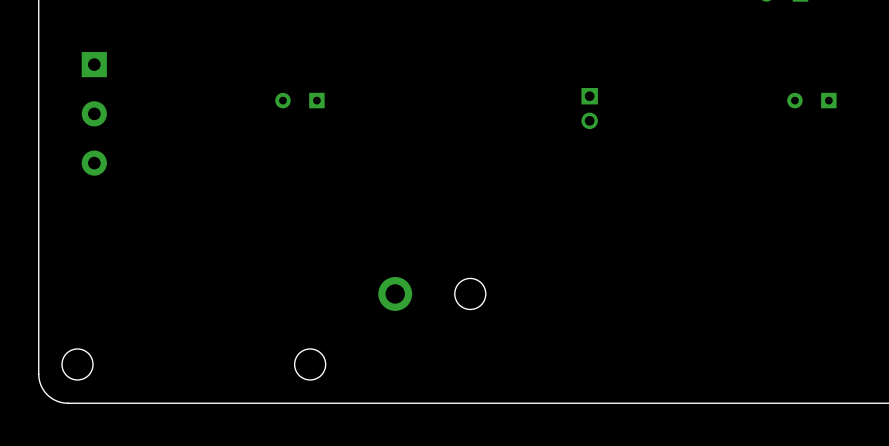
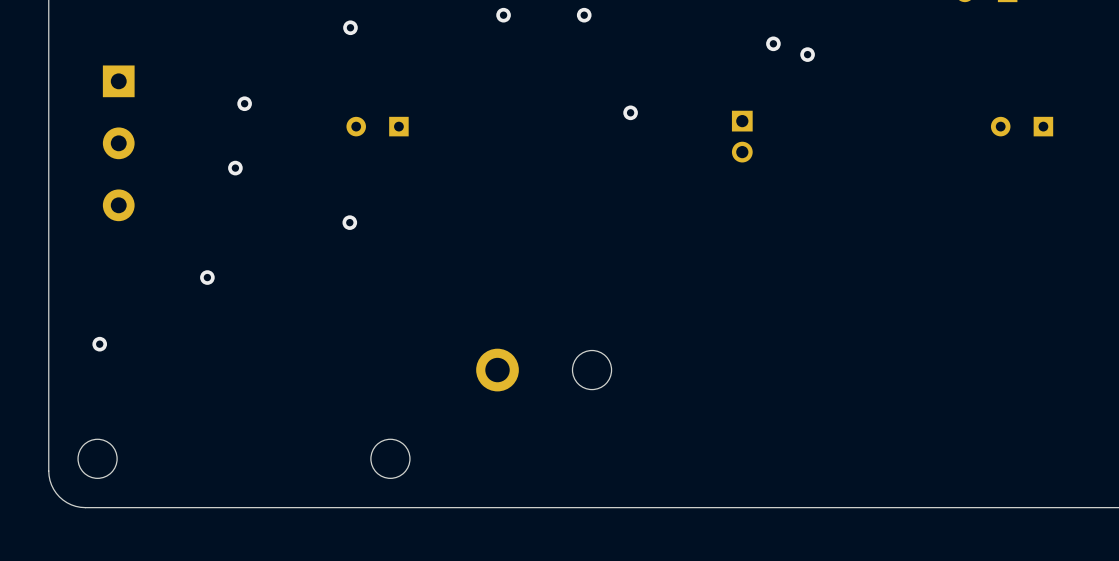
via: none -> (503, 15)
via: none -> (584, 15)
via: none -> (350, 27)
via: none -> (773, 43)
via: none -> (807, 54)
via: none -> (244, 103)
via: none -> (630, 112)
via: none -> (235, 168)
via: none -> (349, 222)
via: none -> (207, 277)
via: none -> (99, 344)

